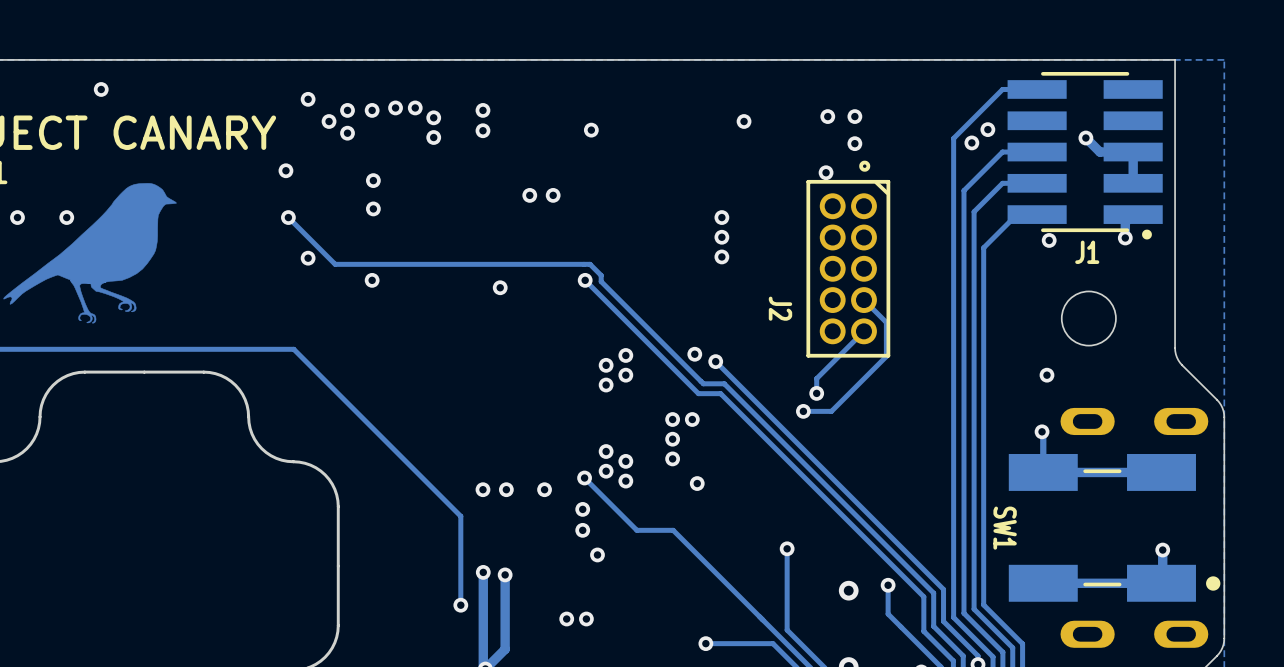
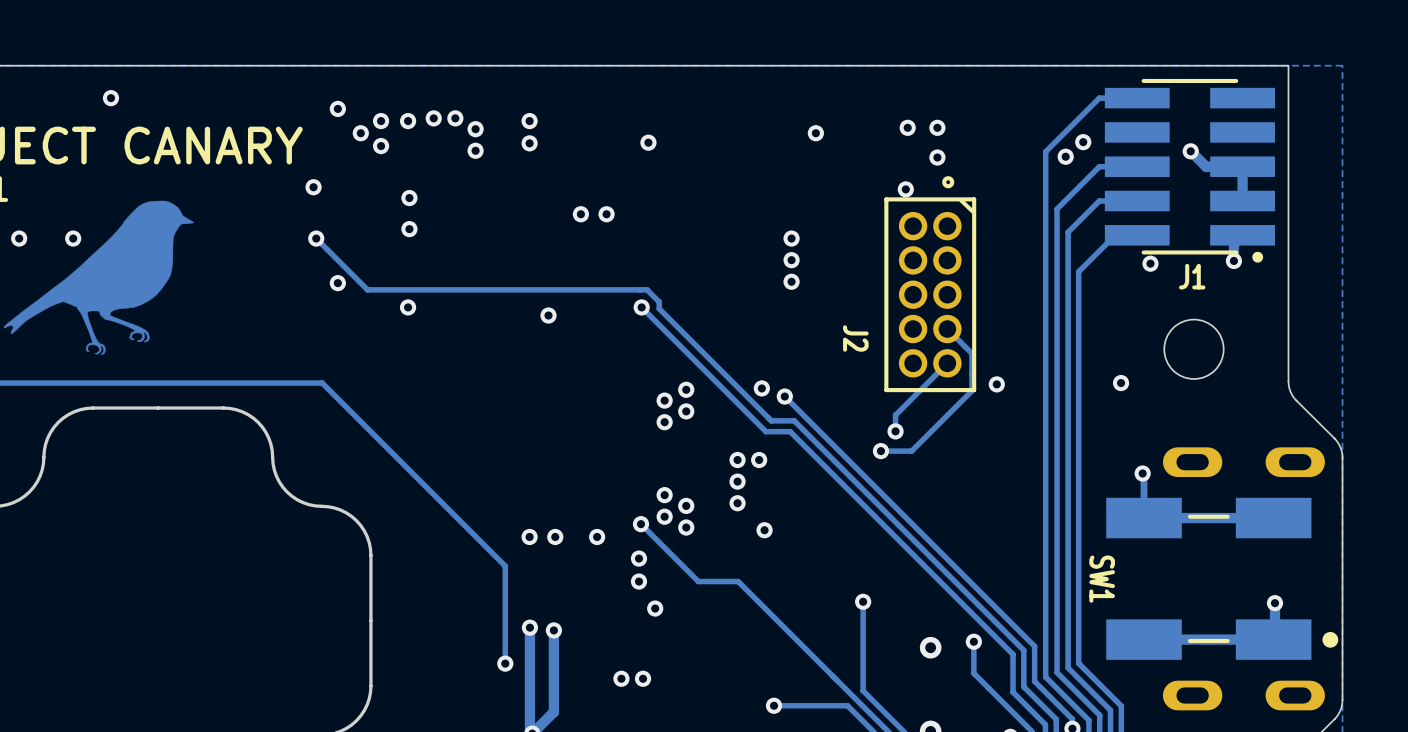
via: none -> (996, 384)
via position: (1046, 375) -> (1121, 383)

